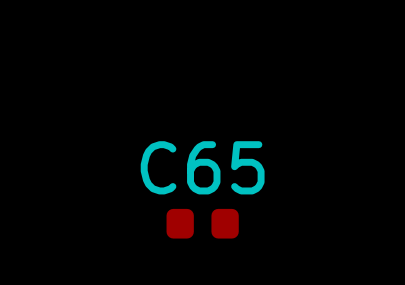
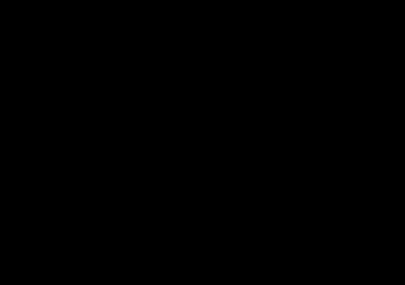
C65: (202, 223) -> none

